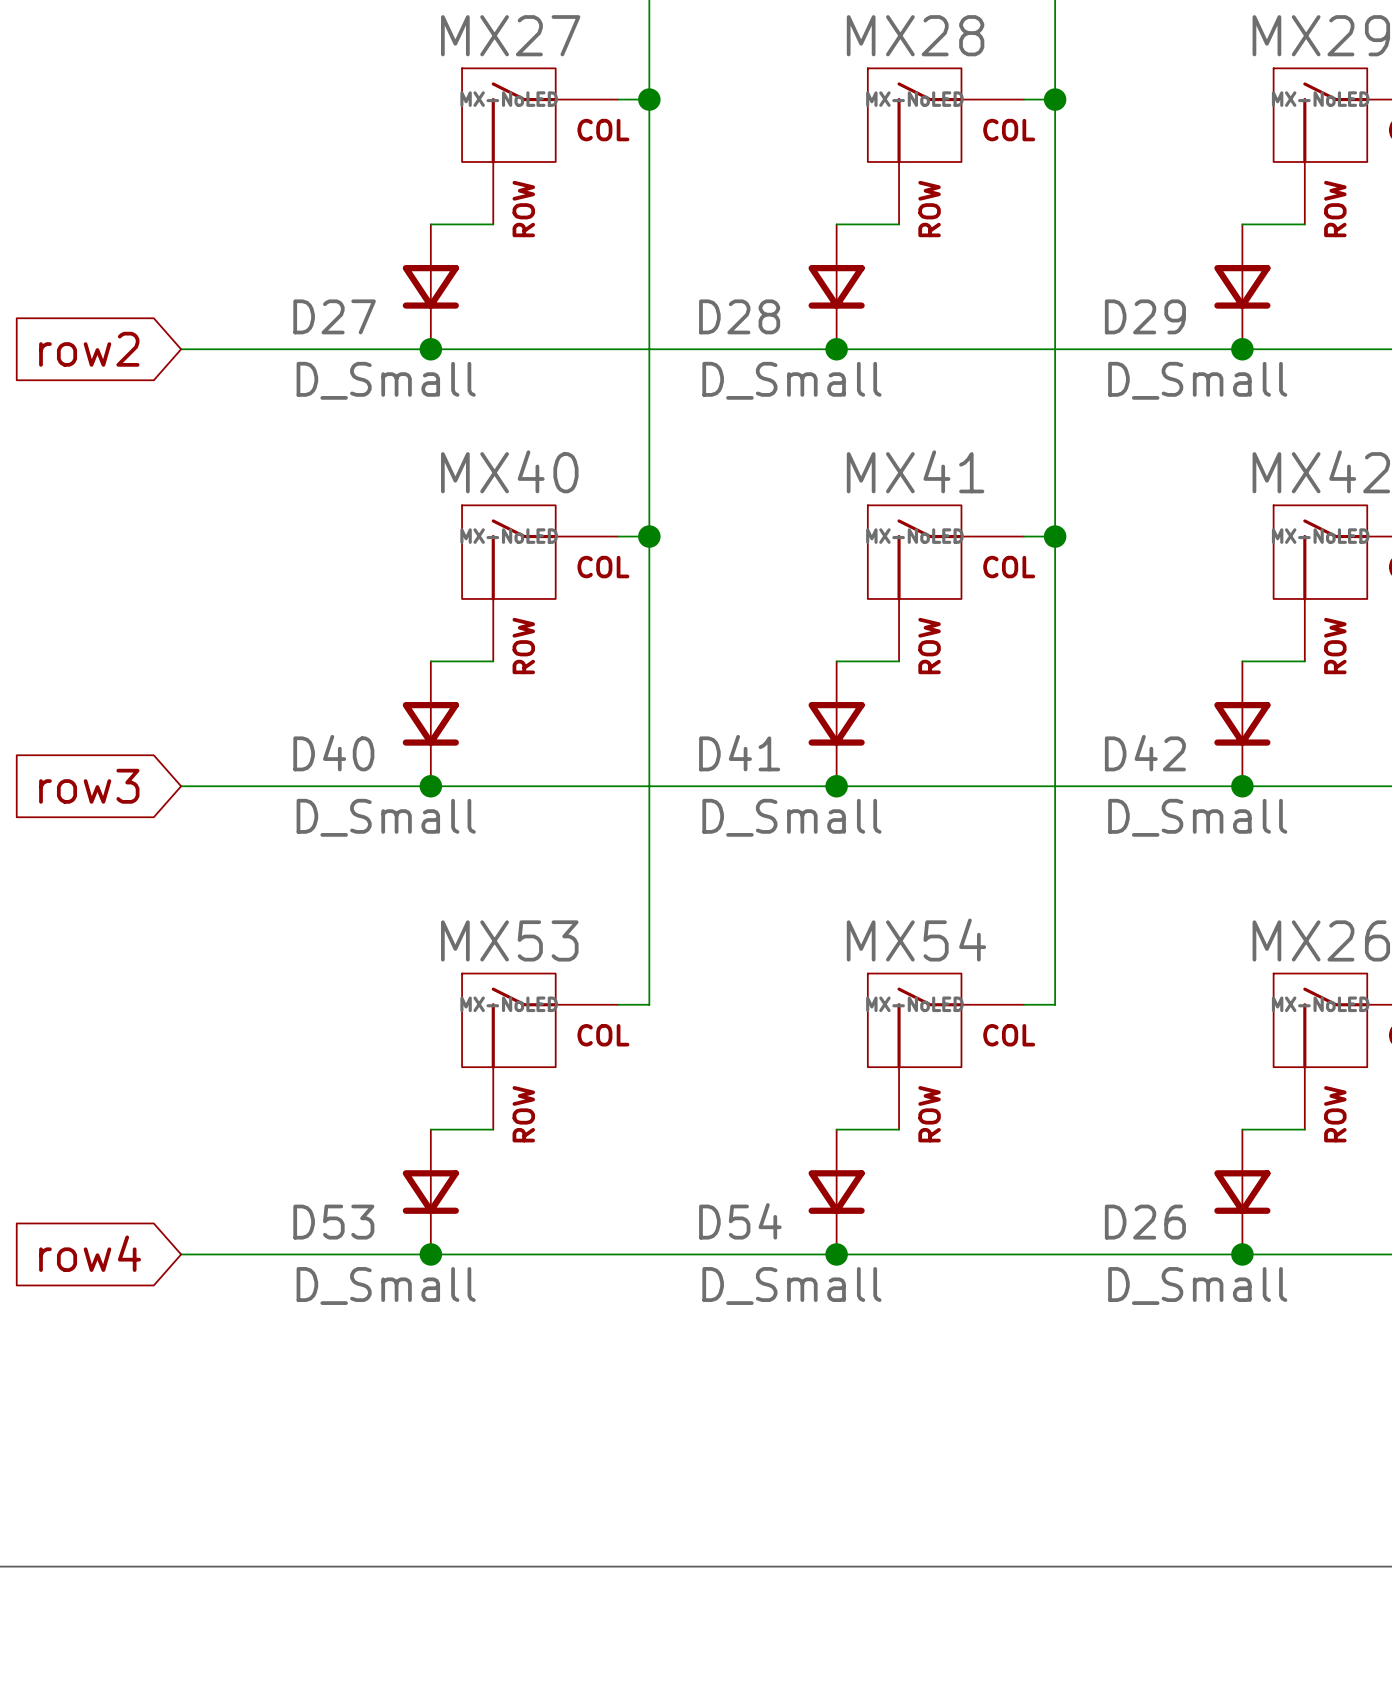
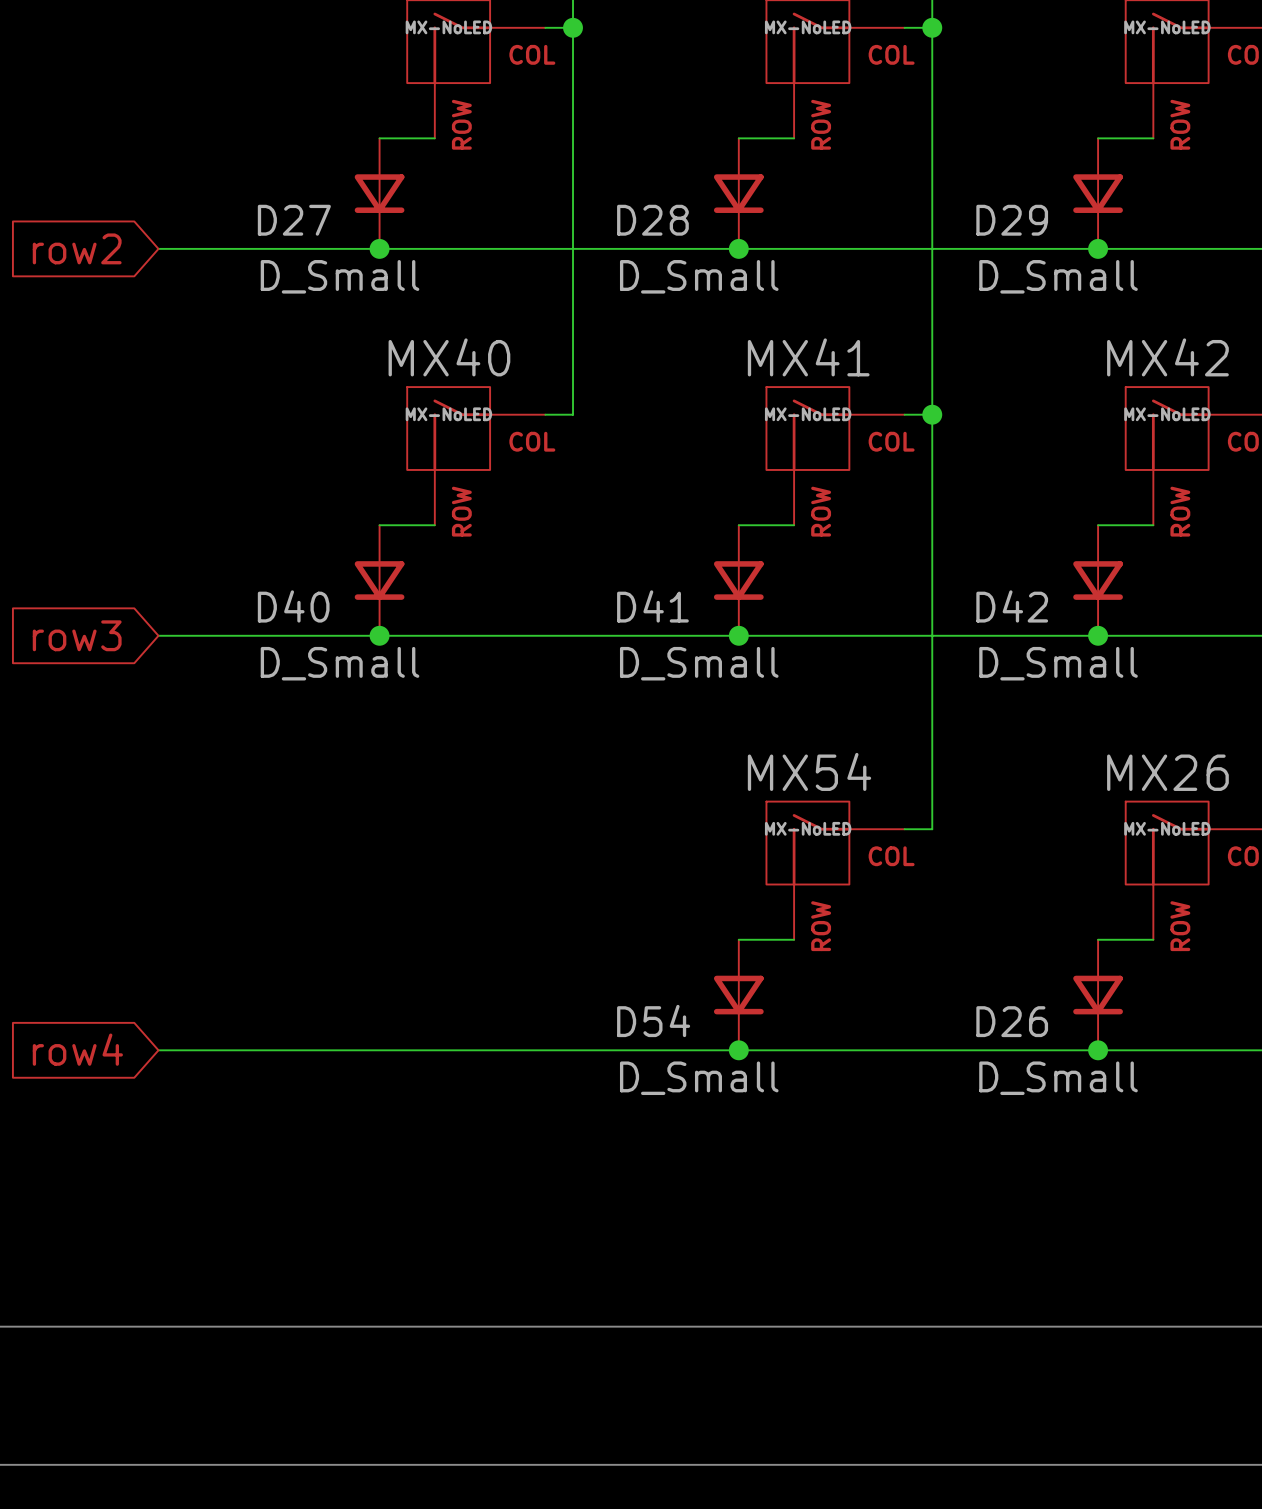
wire: (649, 536) (649, 1004) (618, 1004) -> none
junction: (649, 536) -> none
MX53: MX-NoLED (540, 1051) -> none
wire: (430, 1129) (493, 1129) -> none
D53: D_Small (430, 1192) -> none
junction: (430, 1254) -> none

